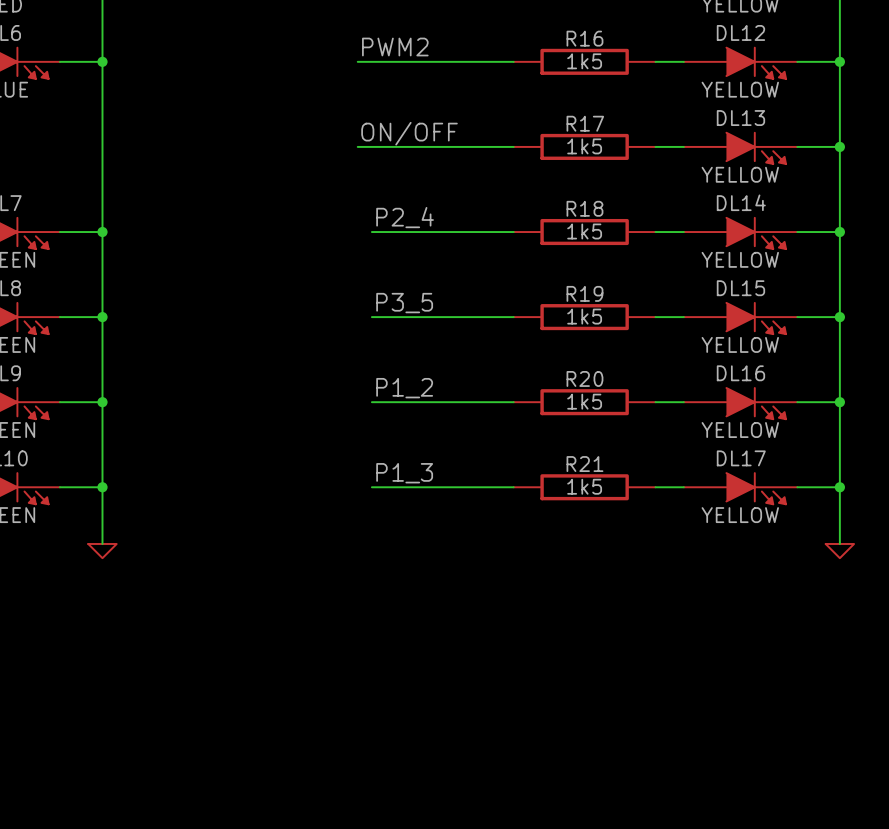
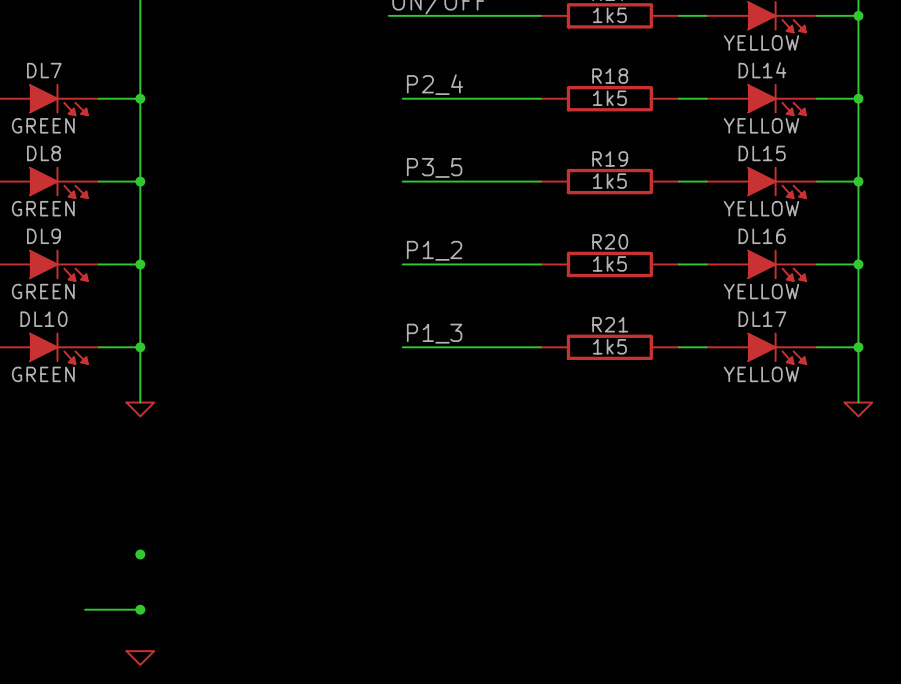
junction: none -> (140, 554)
wire: none -> (85, 609) (140, 609)
junction: none -> (140, 609)
power symbol: none -> (140, 658)

